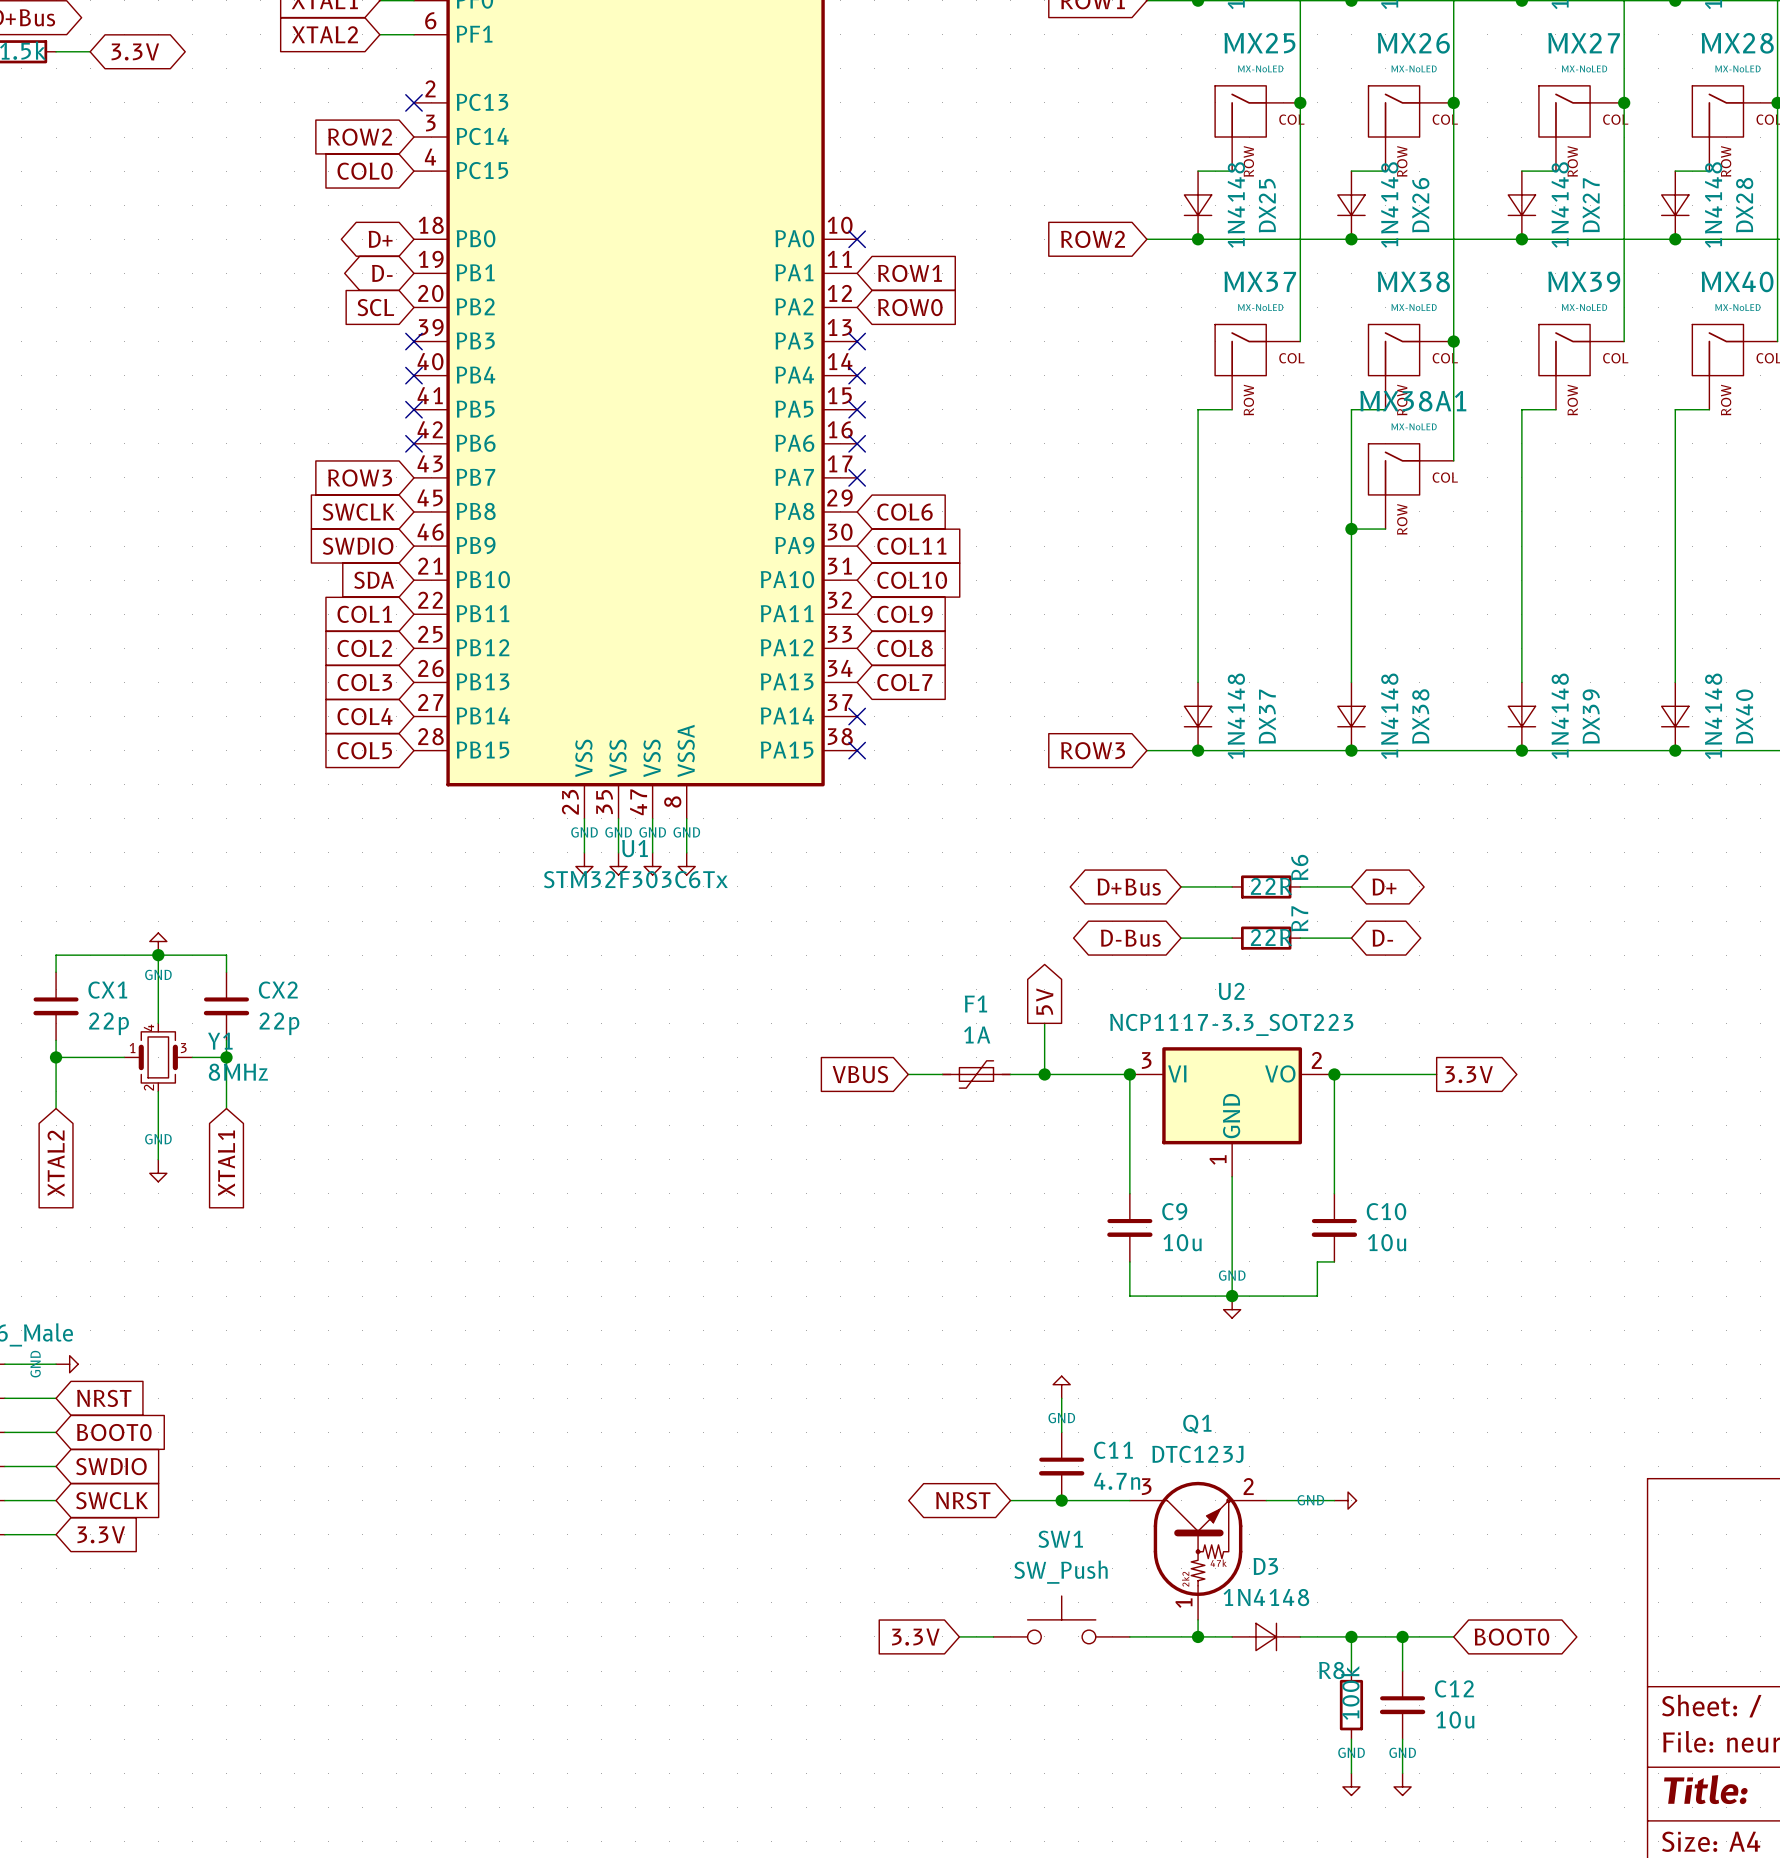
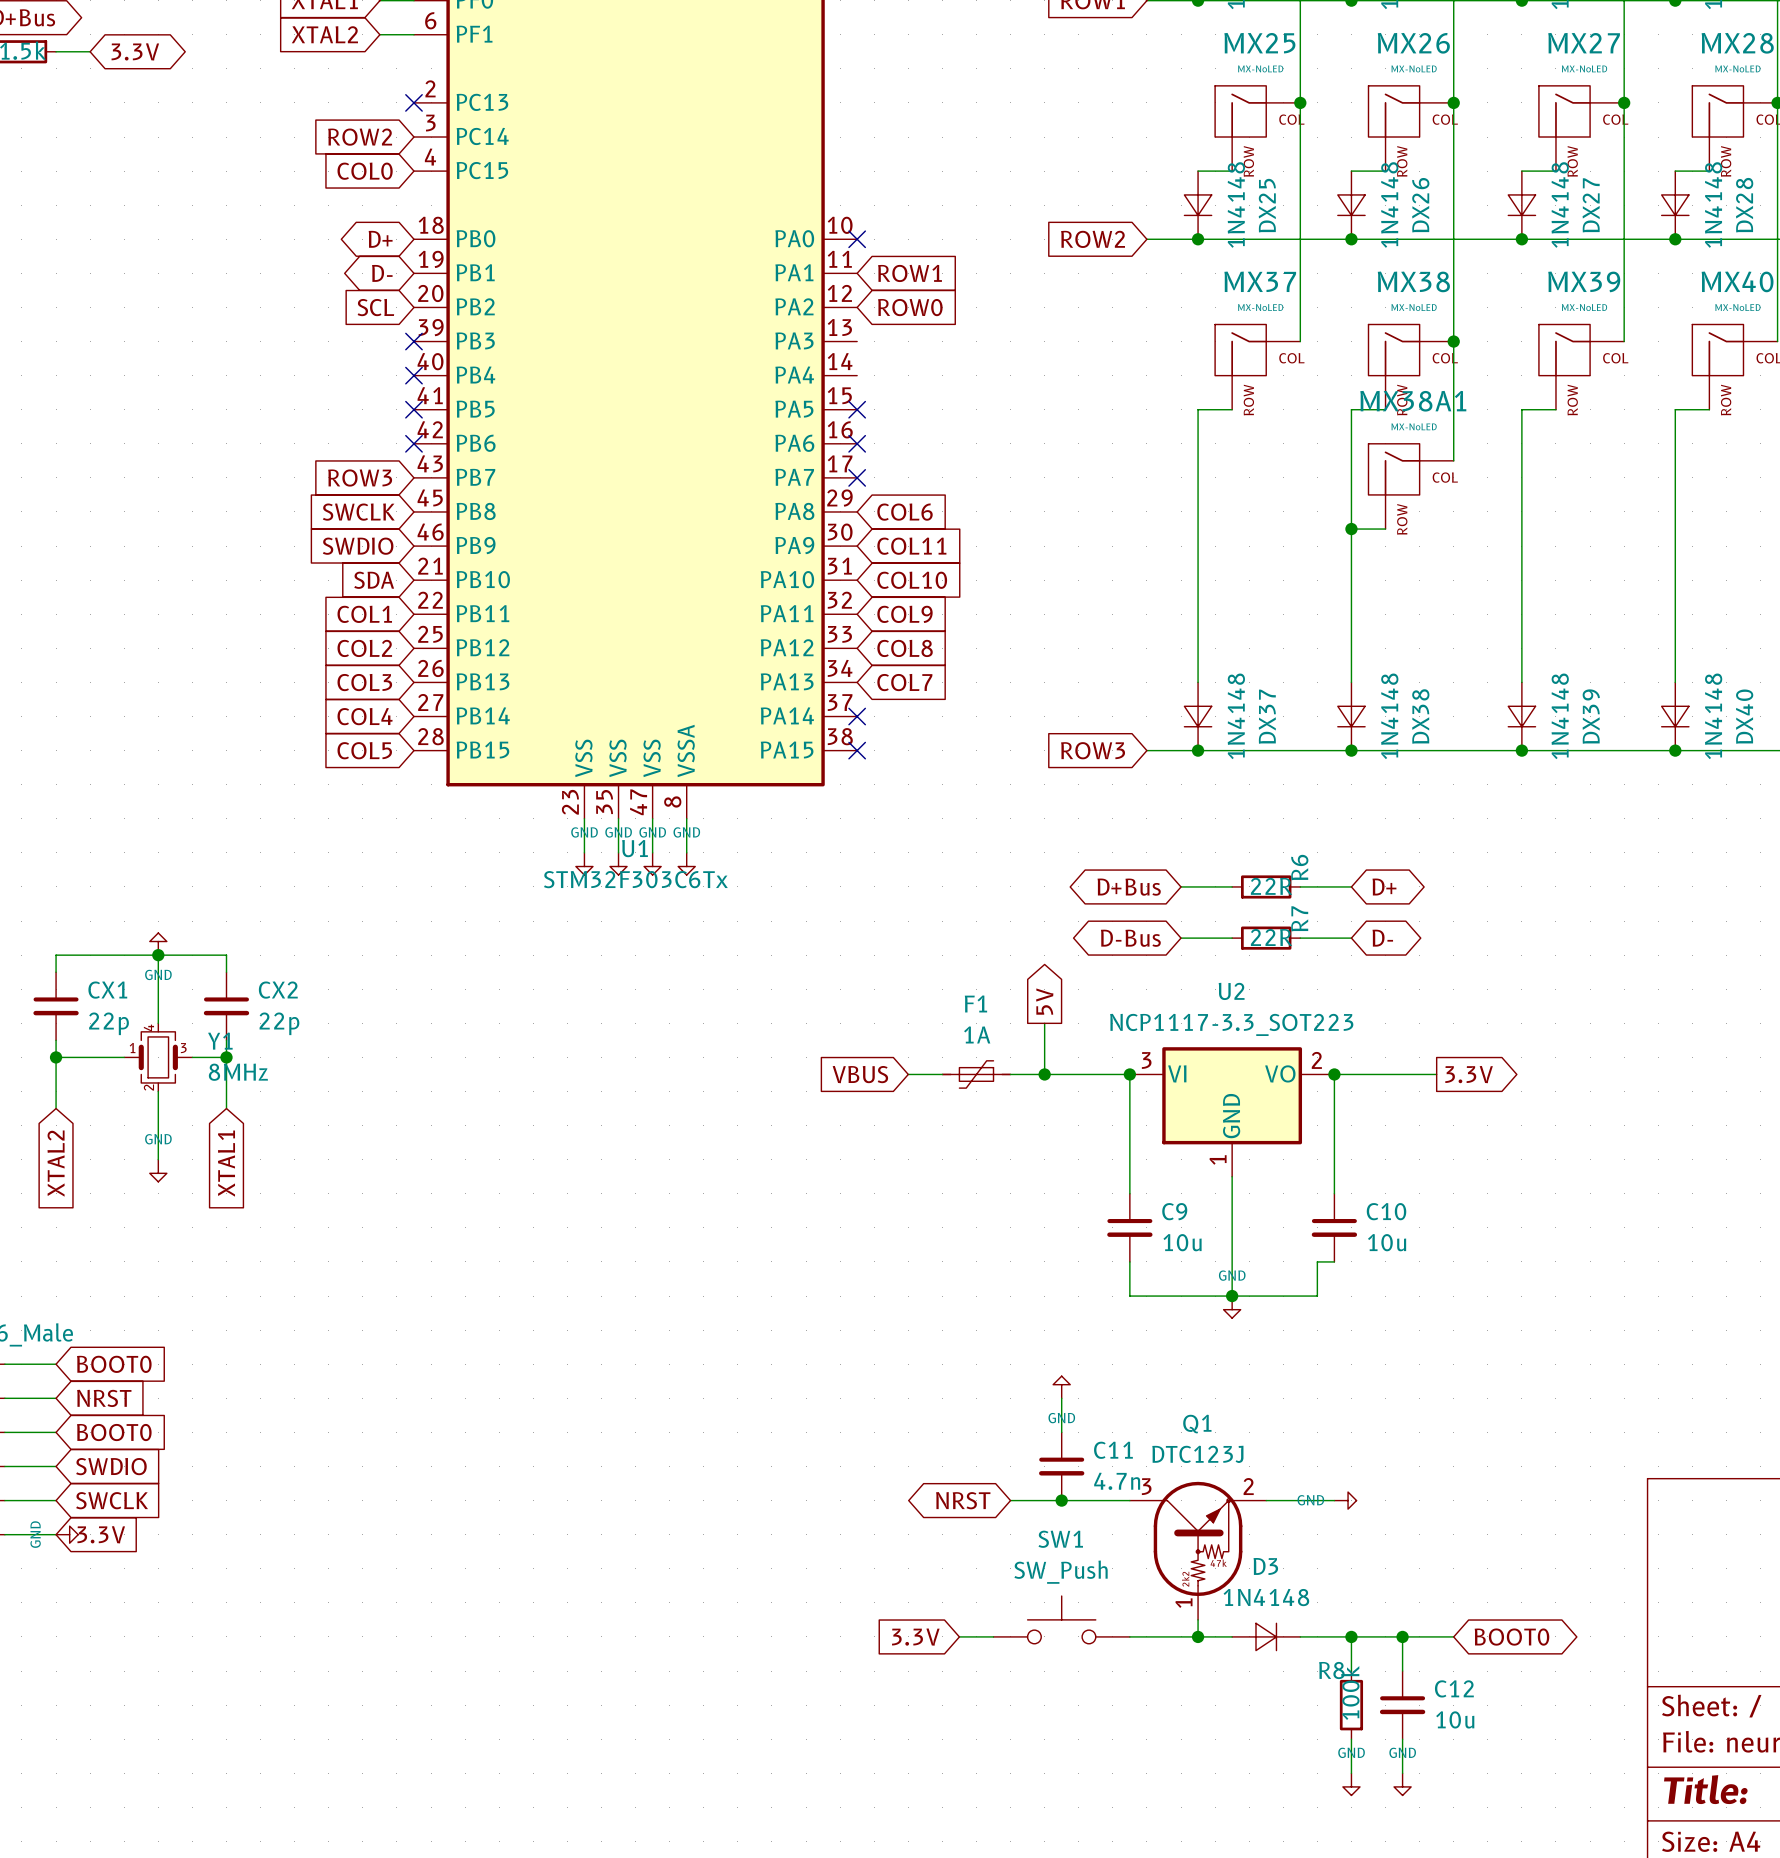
no-connect mark: (857, 341) -> none
no-connect mark: (857, 375) -> none
power symbol position: GND (67, 1364) -> GND (67, 1534)
global label: none -> BOOT0 (114, 1364)

